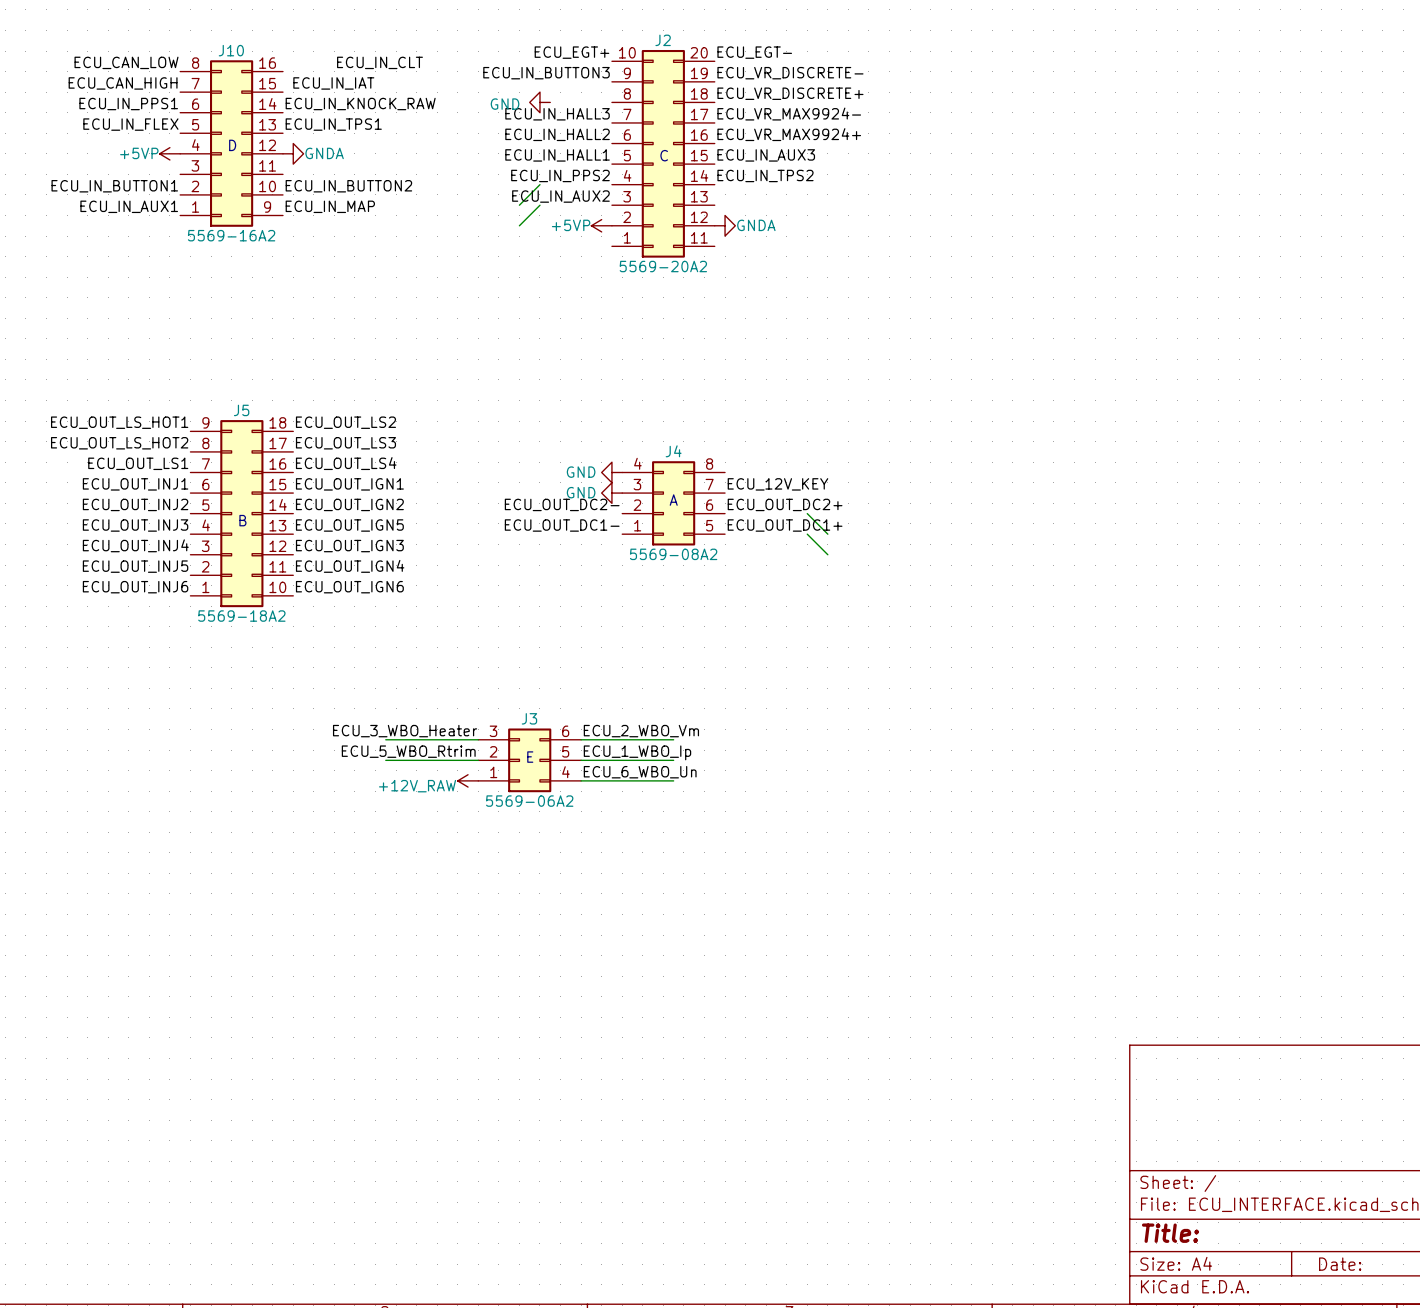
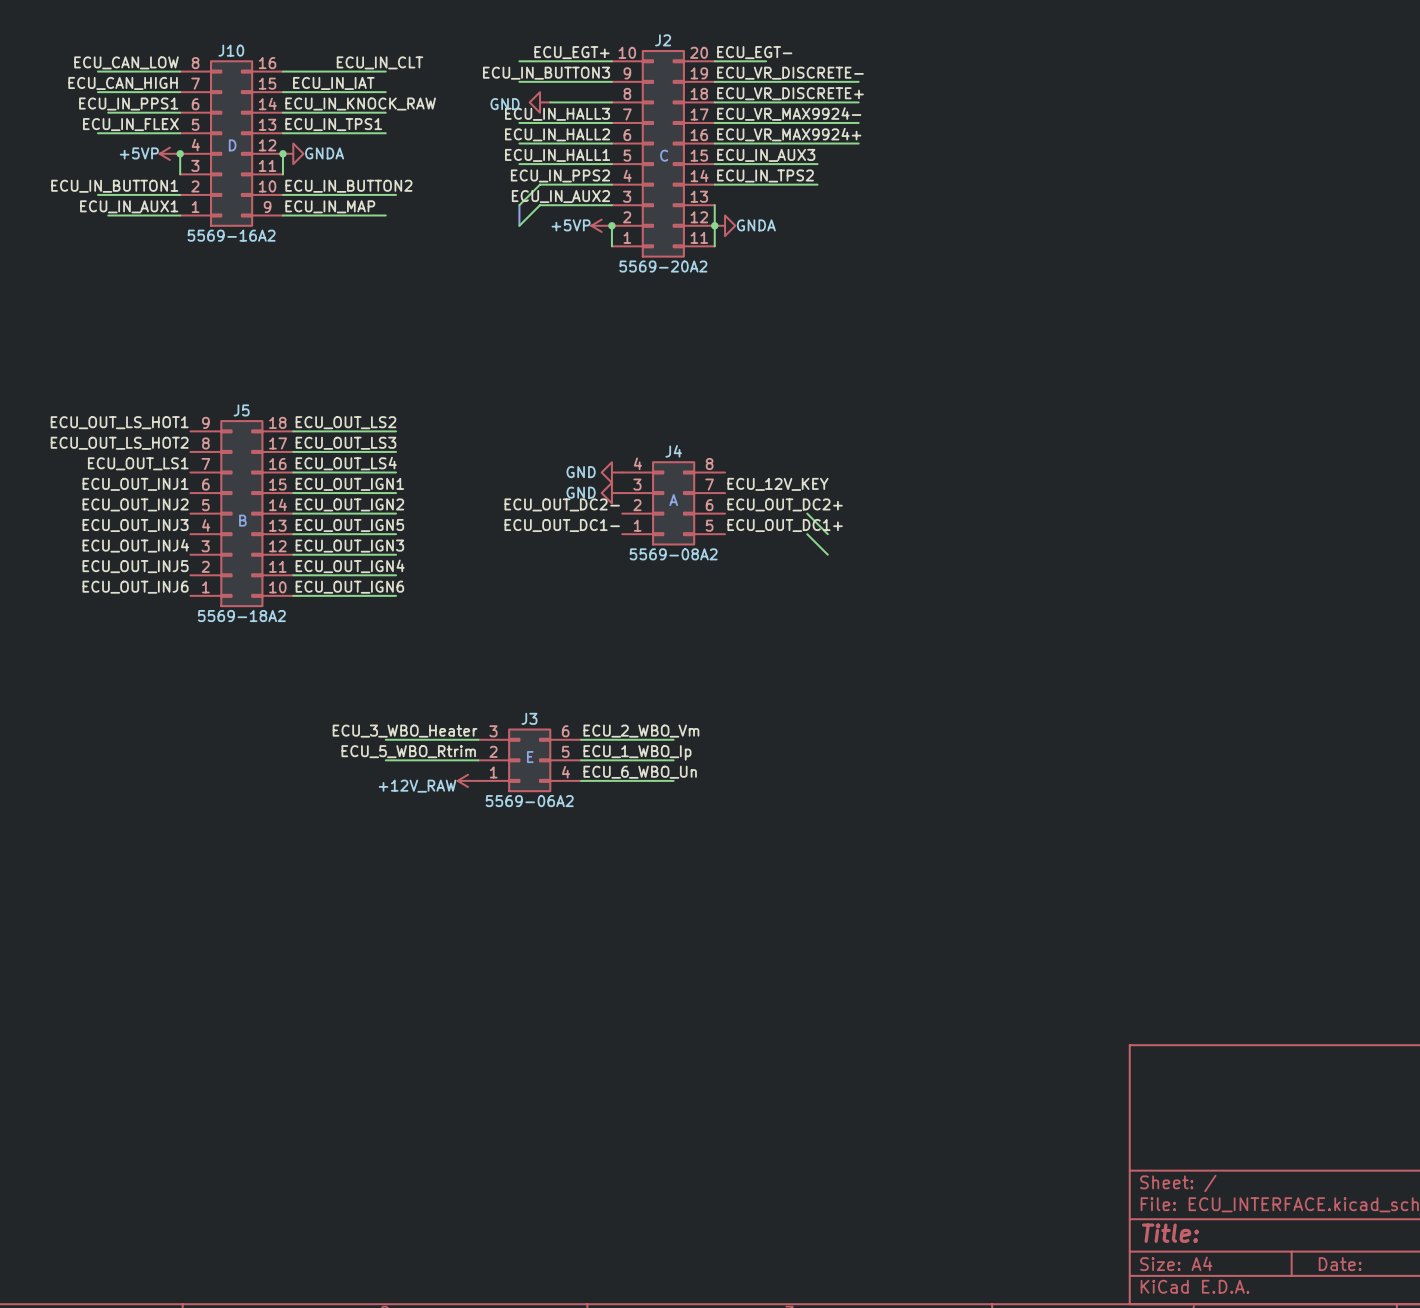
wire: none -> (519, 61) (611, 61)
wire: none -> (714, 61) (766, 61)
wire: none -> (97, 71) (180, 71)
wire: none -> (282, 71) (385, 71)
wire: none -> (519, 81) (611, 81)
wire: none -> (714, 81) (858, 81)
wire: none -> (97, 92) (180, 92)
wire: none -> (282, 92) (385, 92)
wire: none -> (550, 102) (611, 102)
wire: none -> (714, 102) (858, 102)
wire: none -> (108, 112) (180, 112)
wire: none -> (282, 112) (385, 112)
wire: none -> (519, 122) (611, 122)
wire: none -> (714, 122) (858, 122)
wire: none -> (97, 133) (180, 133)
wire: none -> (282, 133) (385, 133)
wire: none -> (519, 143) (611, 143)
wire: none -> (714, 143) (858, 143)
wire: none -> (180, 153) (180, 174)
junction: none -> (180, 153)
wire: none -> (282, 153) (282, 174)
junction: none -> (282, 153)
wire: none -> (519, 164) (611, 164)
wire: none -> (714, 164) (817, 164)
wire: none -> (539, 184) (611, 184)
wire: none -> (714, 184) (817, 184)
wire: none -> (97, 194) (180, 194)
wire: none -> (282, 194) (396, 194)
bus: none -> (519, 205) (519, 225)
wire: none -> (539, 205) (611, 205)
wire: none -> (714, 205) (714, 246)
wire: none -> (108, 215) (180, 215)
wire: none -> (282, 215) (385, 215)
wire: none -> (611, 225) (611, 246)
junction: none -> (611, 225)
junction: none -> (714, 225)
wire: none -> (293, 431) (396, 431)
wire: none -> (293, 451) (396, 451)
wire: none -> (293, 472) (396, 472)
wire: none -> (293, 493) (396, 493)
wire: none -> (293, 513) (396, 513)
wire: none -> (293, 534) (396, 534)
wire: none -> (293, 554) (396, 554)
wire: none -> (293, 575) (396, 575)
wire: none -> (293, 595) (396, 595)

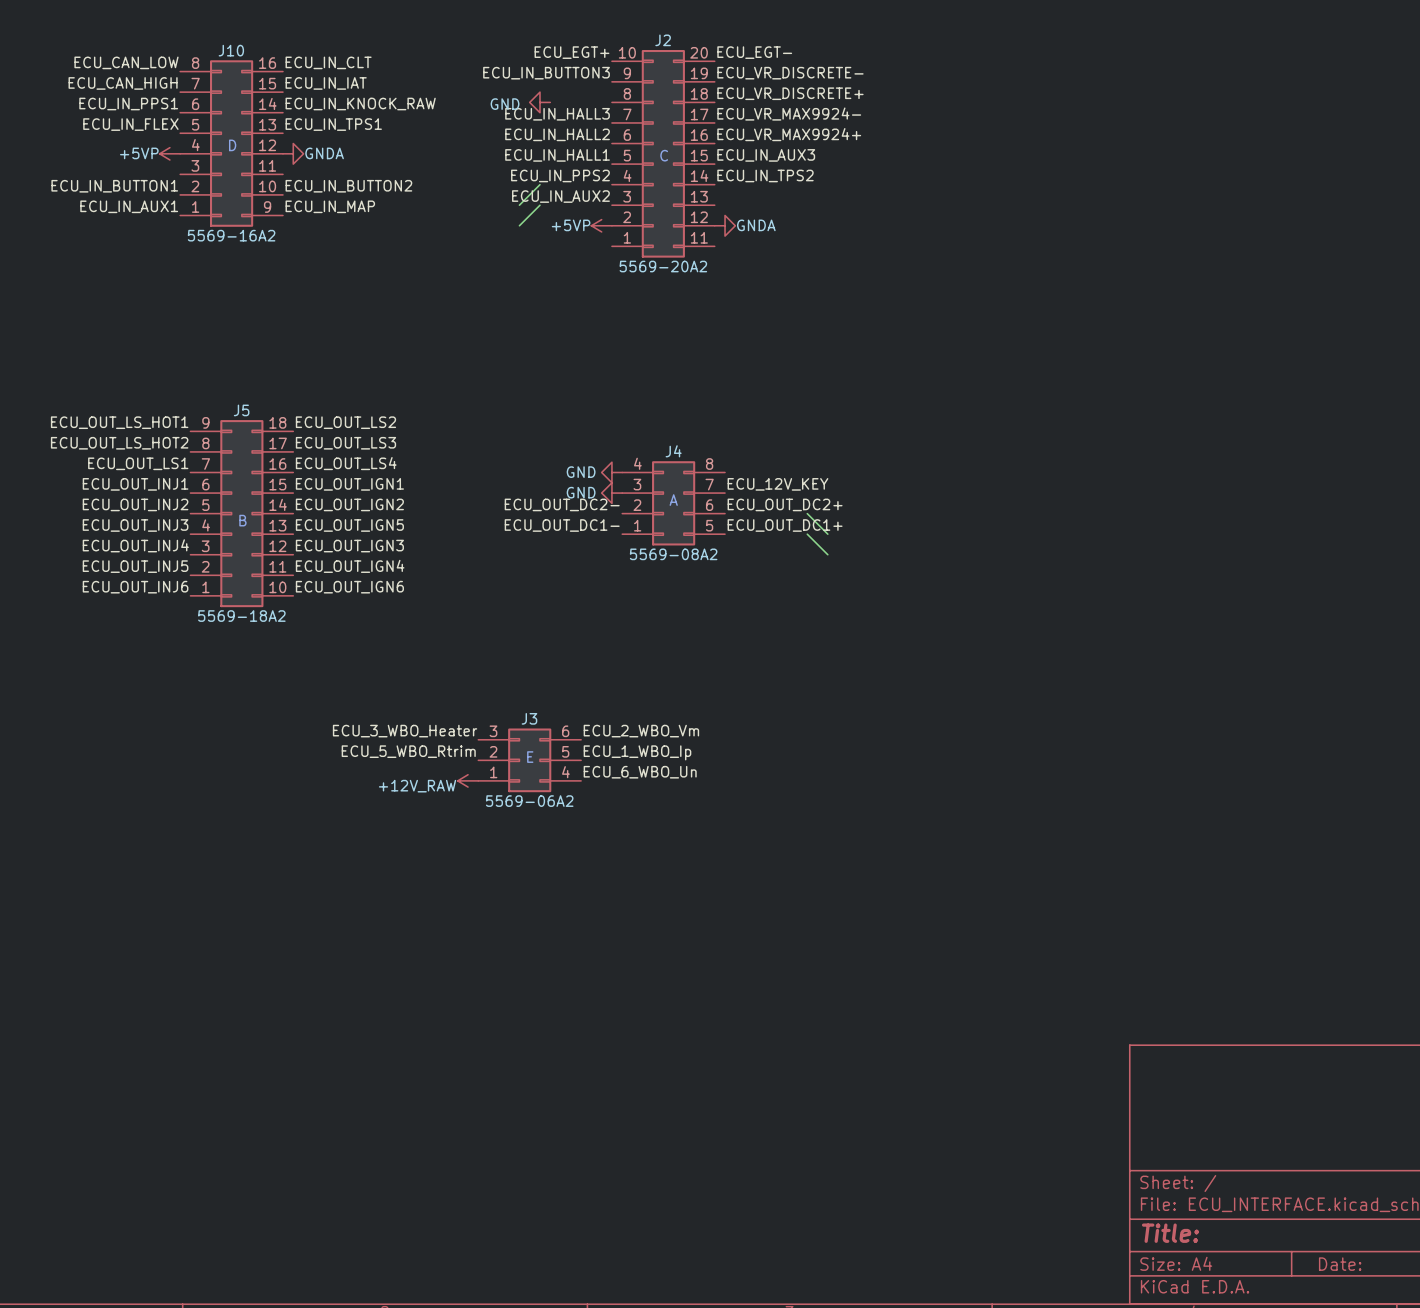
wire: (519, 61) (611, 61) -> none
wire: (714, 61) (766, 61) -> none
label position: ECU_IN_CLT (379, 62) -> ECU_IN_CLT (328, 62)
wire: (97, 71) (180, 71) -> none
wire: (282, 71) (385, 71) -> none
wire: (519, 81) (611, 81) -> none
wire: (714, 81) (858, 81) -> none
label position: ECU_IN_IAT (333, 83) -> ECU_IN_IAT (326, 83)
wire: (97, 92) (180, 92) -> none
wire: (282, 92) (385, 92) -> none
wire: (550, 102) (611, 102) -> none
wire: (714, 102) (858, 102) -> none
wire: (108, 112) (180, 112) -> none
wire: (282, 112) (385, 112) -> none
wire: (519, 122) (611, 122) -> none
wire: (714, 122) (858, 122) -> none
wire: (97, 133) (180, 133) -> none
wire: (282, 133) (385, 133) -> none
wire: (519, 143) (611, 143) -> none
wire: (714, 143) (858, 143) -> none
wire: (180, 153) (180, 174) -> none
junction: (180, 153) -> none
wire: (282, 153) (282, 174) -> none
junction: (282, 153) -> none
wire: (519, 164) (611, 164) -> none
wire: (714, 164) (817, 164) -> none
wire: (539, 184) (611, 184) -> none
wire: (714, 184) (817, 184) -> none
wire: (97, 194) (180, 194) -> none
wire: (282, 194) (396, 194) -> none
bus: (519, 205) (519, 225) -> none
wire: (539, 205) (611, 205) -> none
wire: (714, 205) (714, 246) -> none
wire: (108, 215) (180, 215) -> none
wire: (282, 215) (385, 215) -> none
wire: (611, 225) (611, 246) -> none
junction: (611, 225) -> none
junction: (714, 225) -> none
wire: (293, 431) (396, 431) -> none
wire: (293, 451) (396, 451) -> none
wire: (293, 472) (396, 472) -> none
wire: (293, 493) (396, 493) -> none
wire: (293, 513) (396, 513) -> none
wire: (293, 534) (396, 534) -> none
wire: (293, 554) (396, 554) -> none
wire: (293, 575) (396, 575) -> none
wire: (293, 595) (396, 595) -> none
wire: (385, 739) (478, 739) -> none
wire: (581, 739) (673, 739) -> none
wire: (385, 760) (478, 760) -> none
wire: (581, 760) (673, 760) -> none
wire: (581, 780) (673, 780) -> none

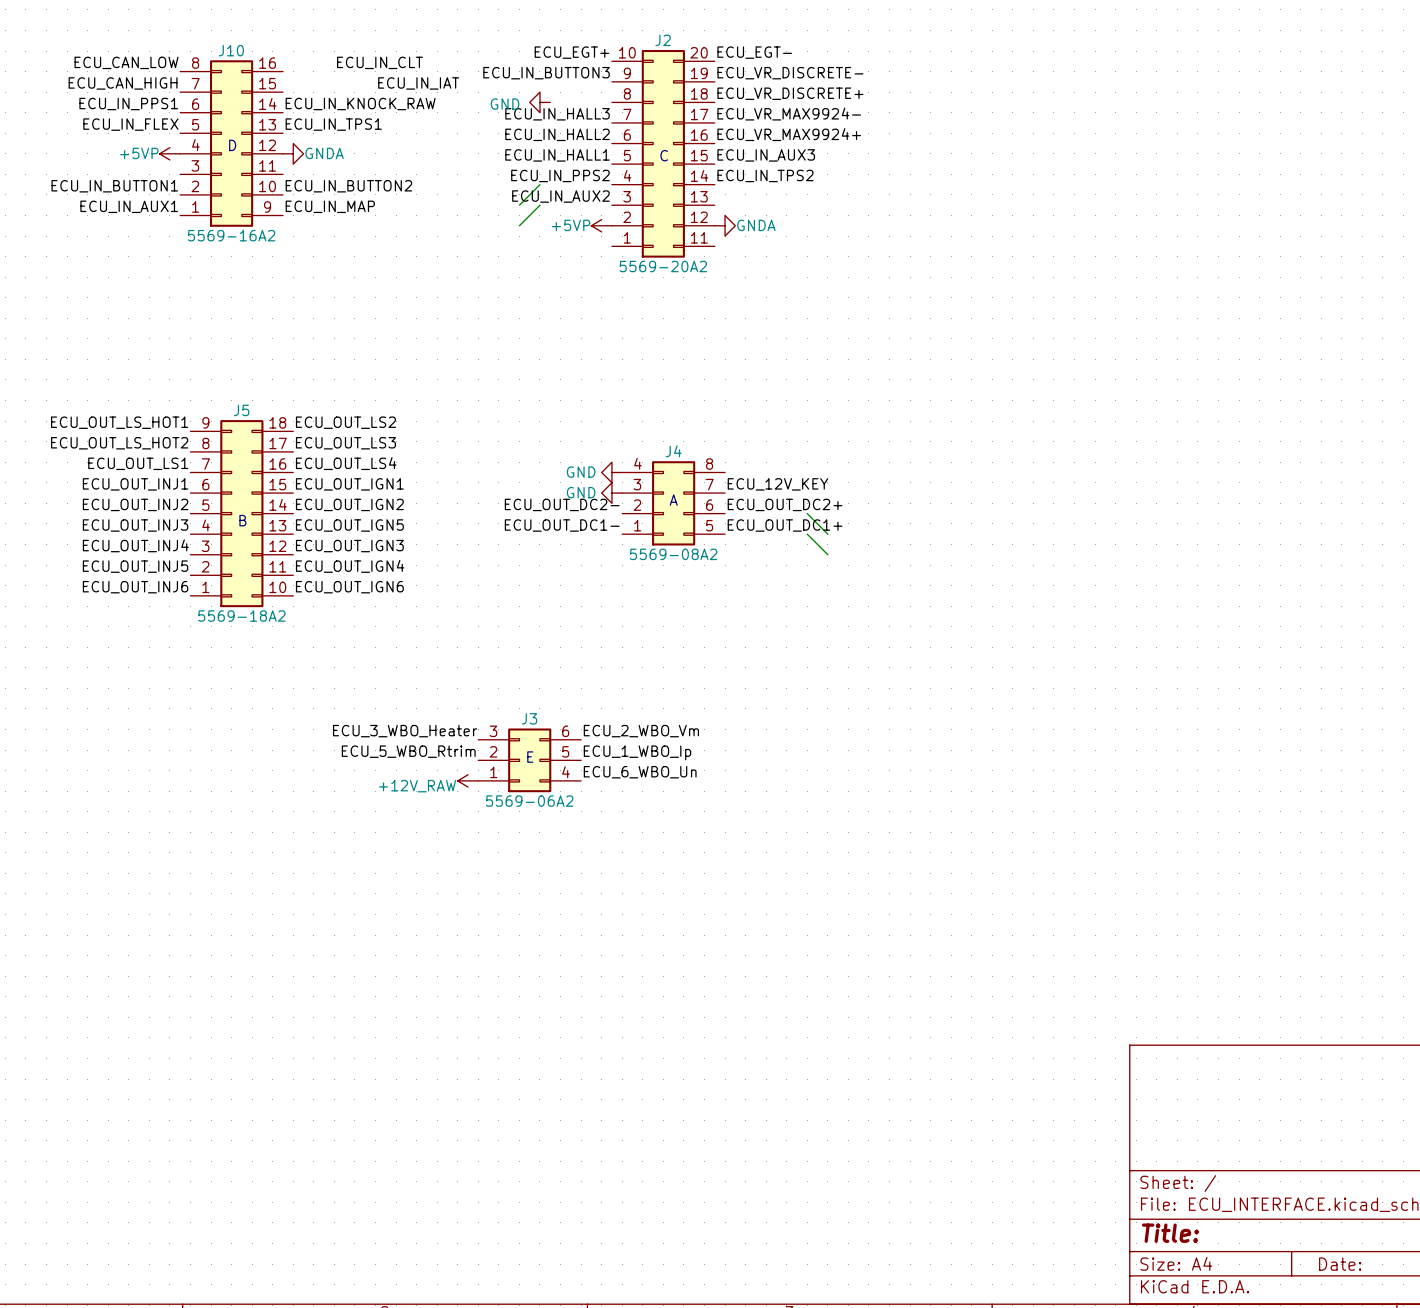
label position: ECU_IN_CLT (328, 62) -> ECU_IN_CLT (379, 62)
label position: ECU_IN_IAT (326, 83) -> ECU_IN_IAT (418, 83)

